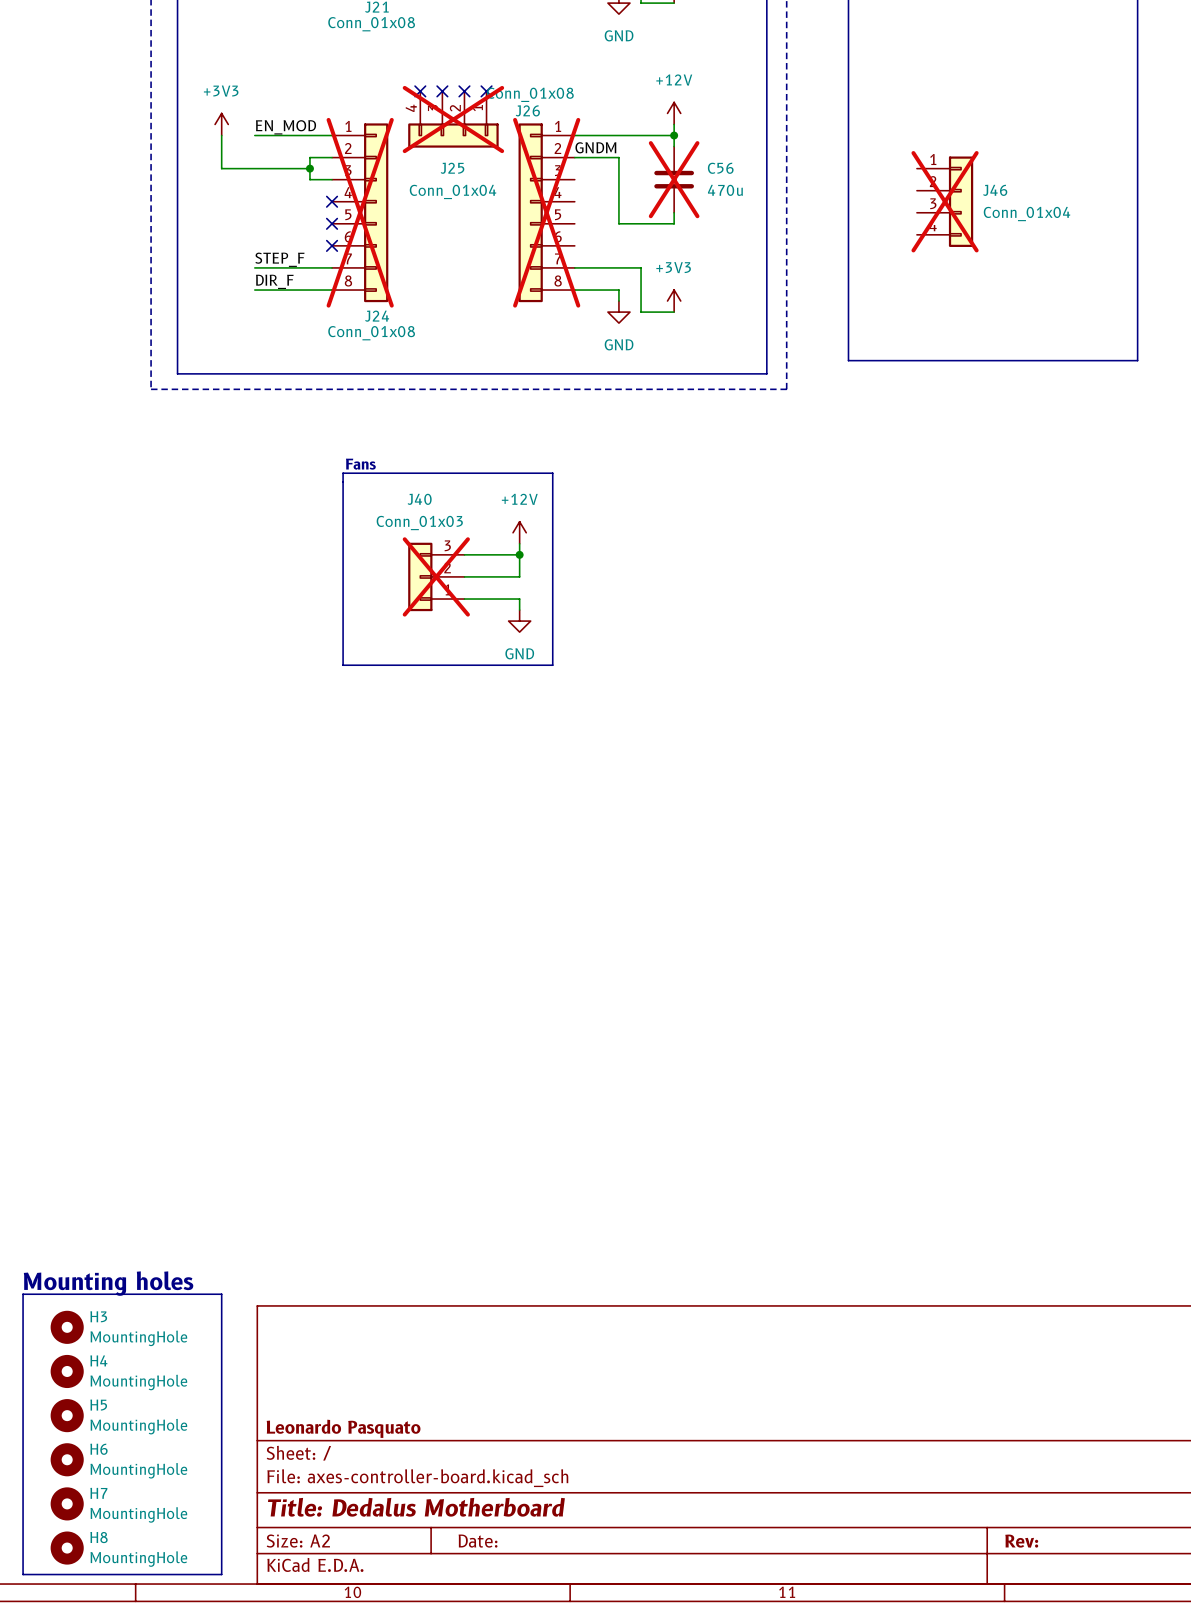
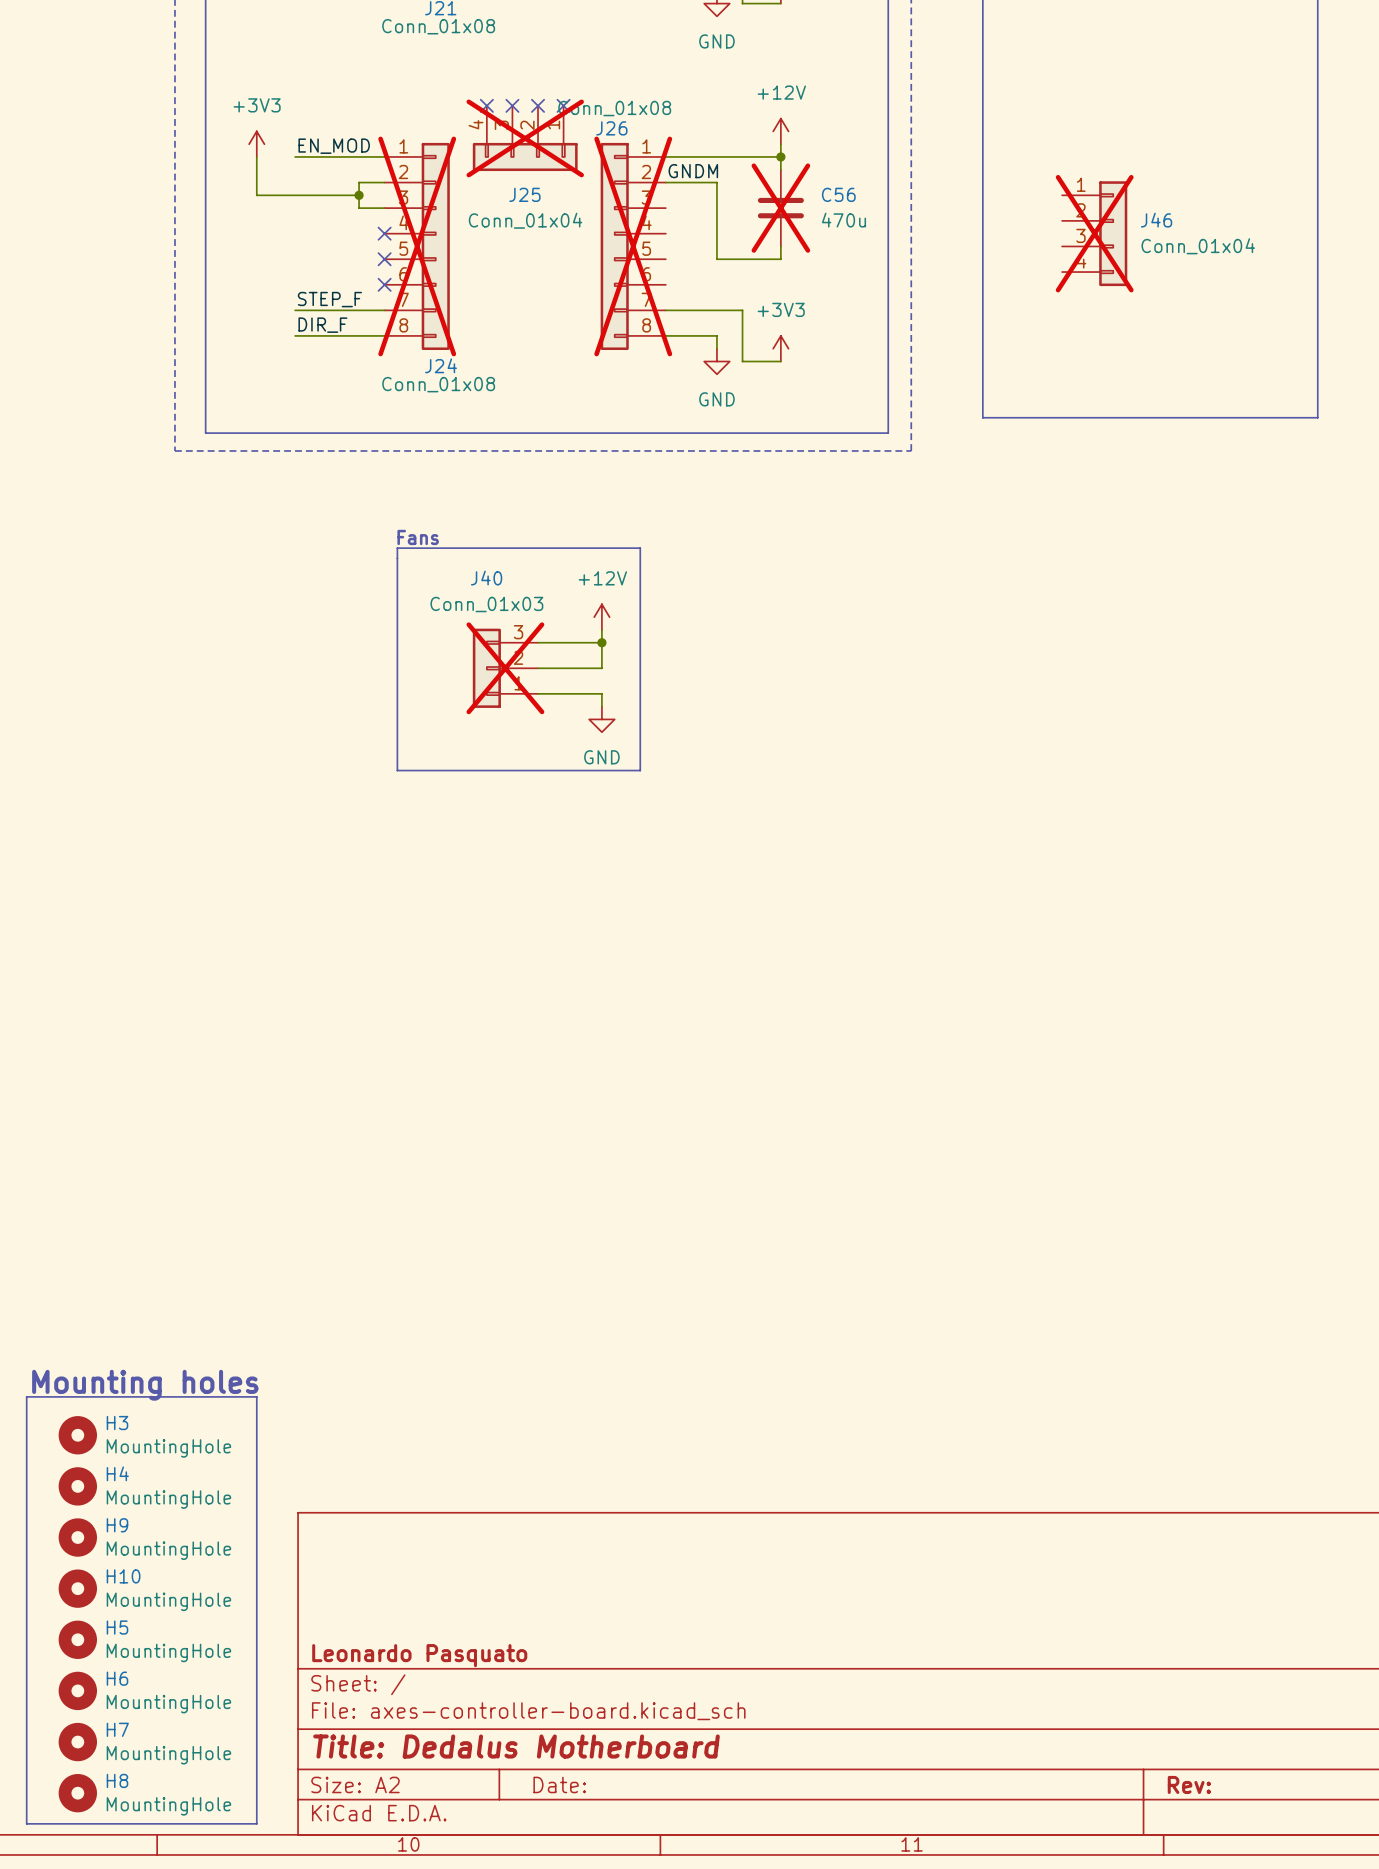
H3: none -> MountingHole (77, 1435)
H4: none -> MountingHole (77, 1486)
text position: Mounting holes (108, 1283) -> Mounting holes (145, 1385)
line: (23, 1294) (221, 1294) -> (26, 1499) (26, 1396) (256, 1396) (256, 1499)
H3 name: H3 (98, 1316) -> H9 (117, 1525)
H4 name: H4 (98, 1360) -> H10 (123, 1576)

